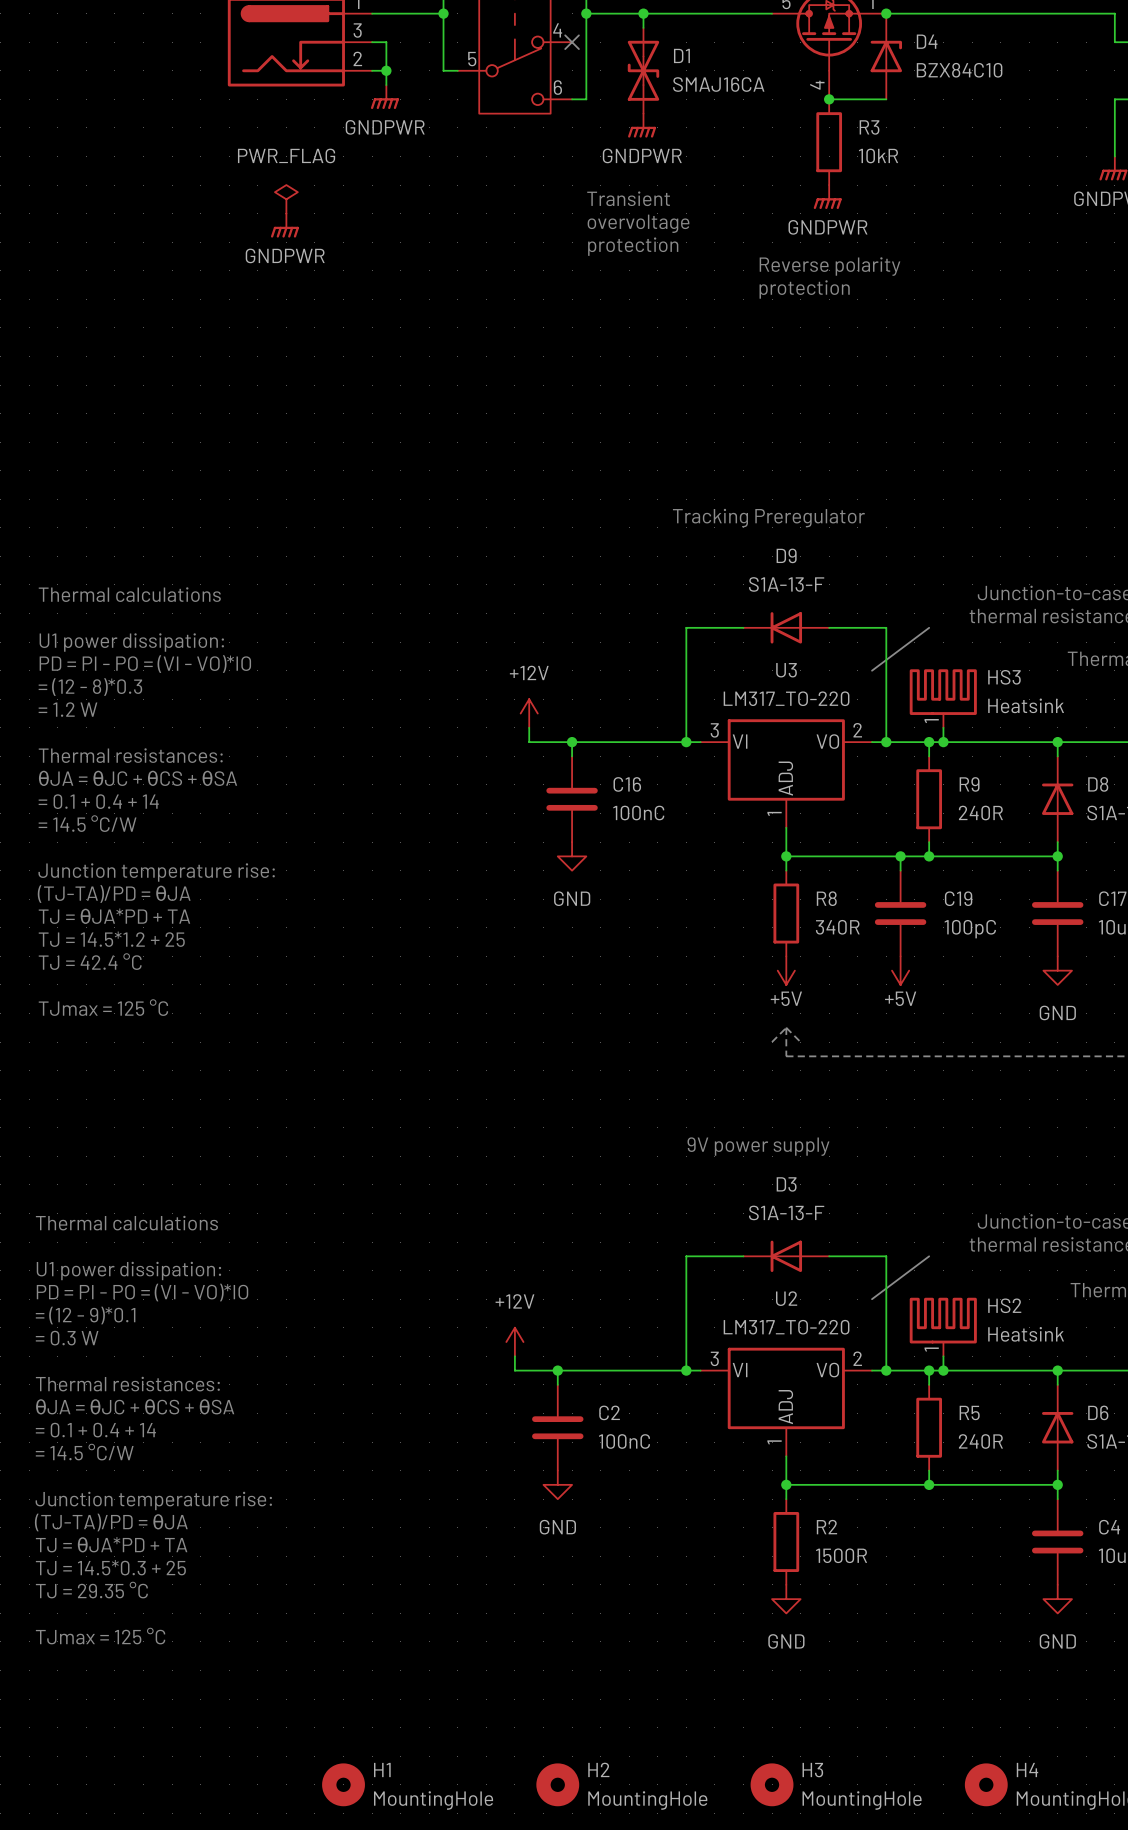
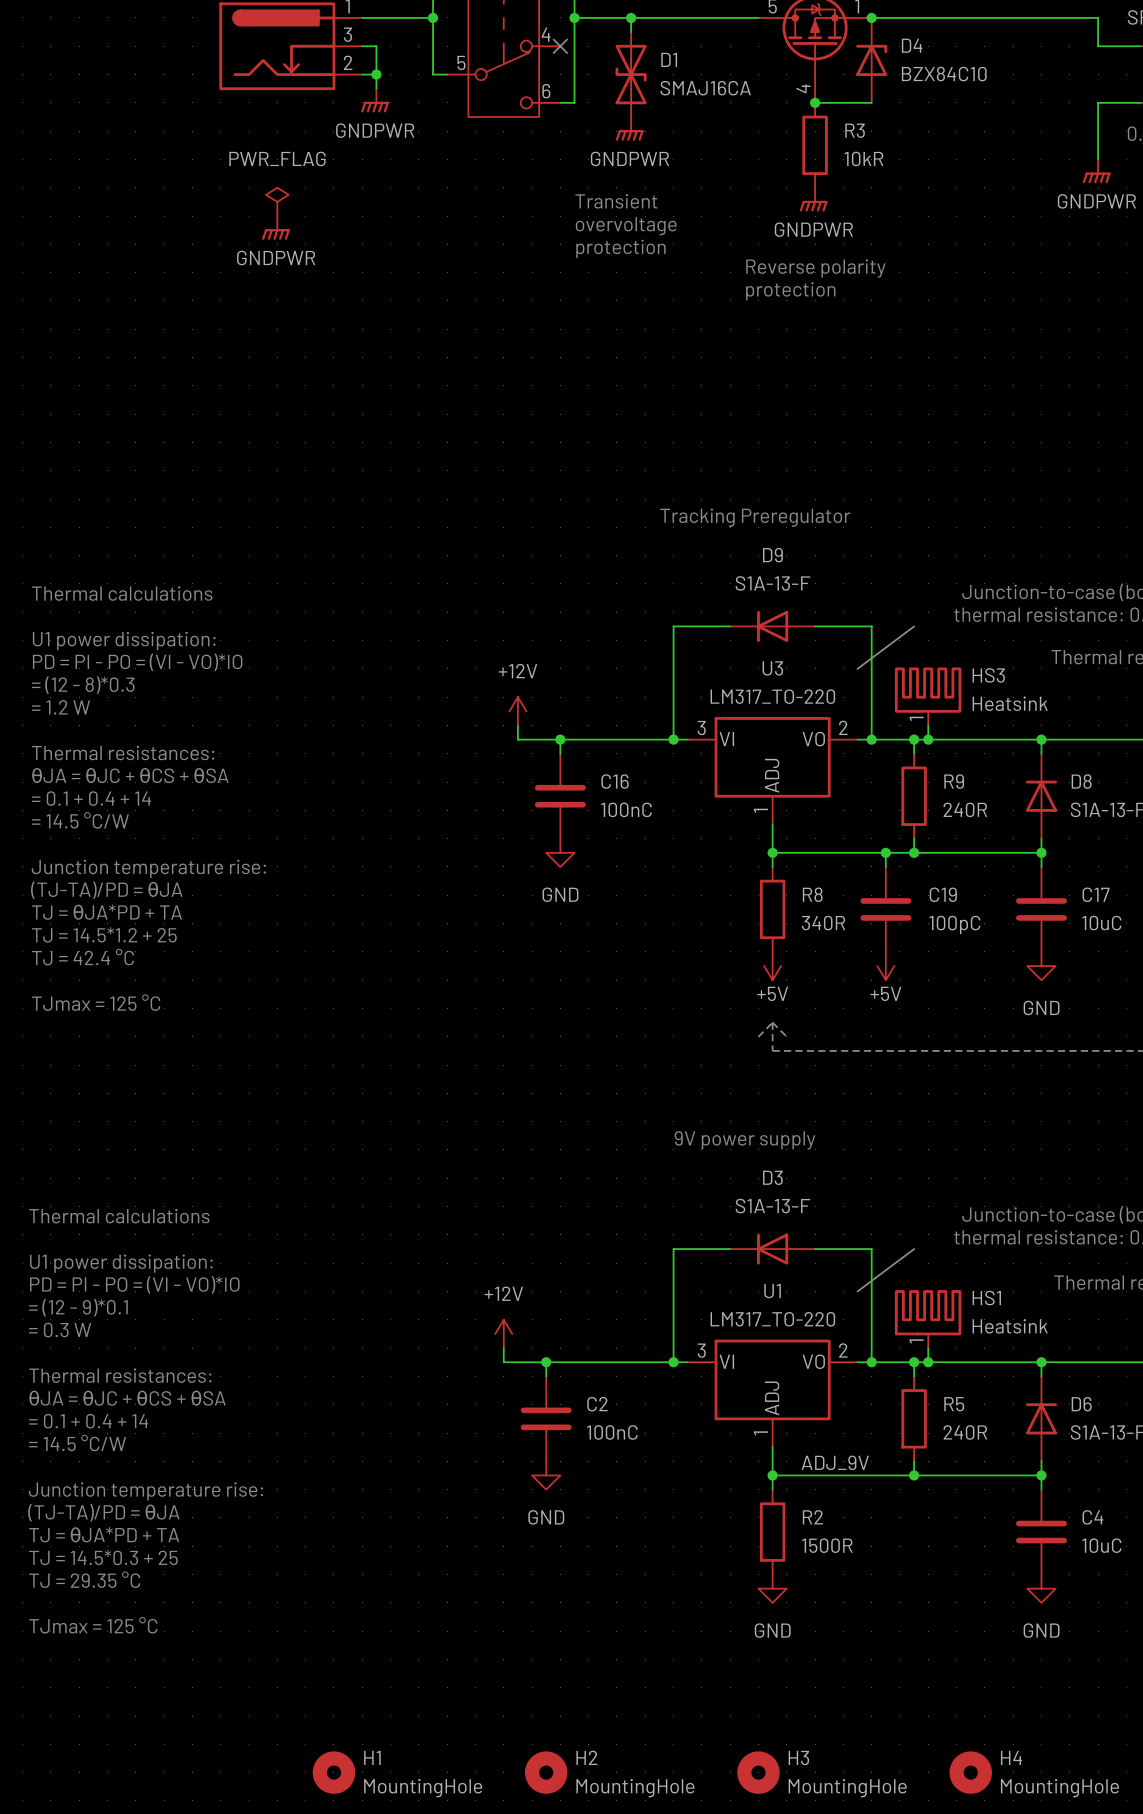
U2 name: U2 (786, 1298) -> U1 (772, 1291)
HS2 name: HS2 (1004, 1305) -> HS1 (986, 1298)
label: none -> ADJ_9V (835, 1462)

